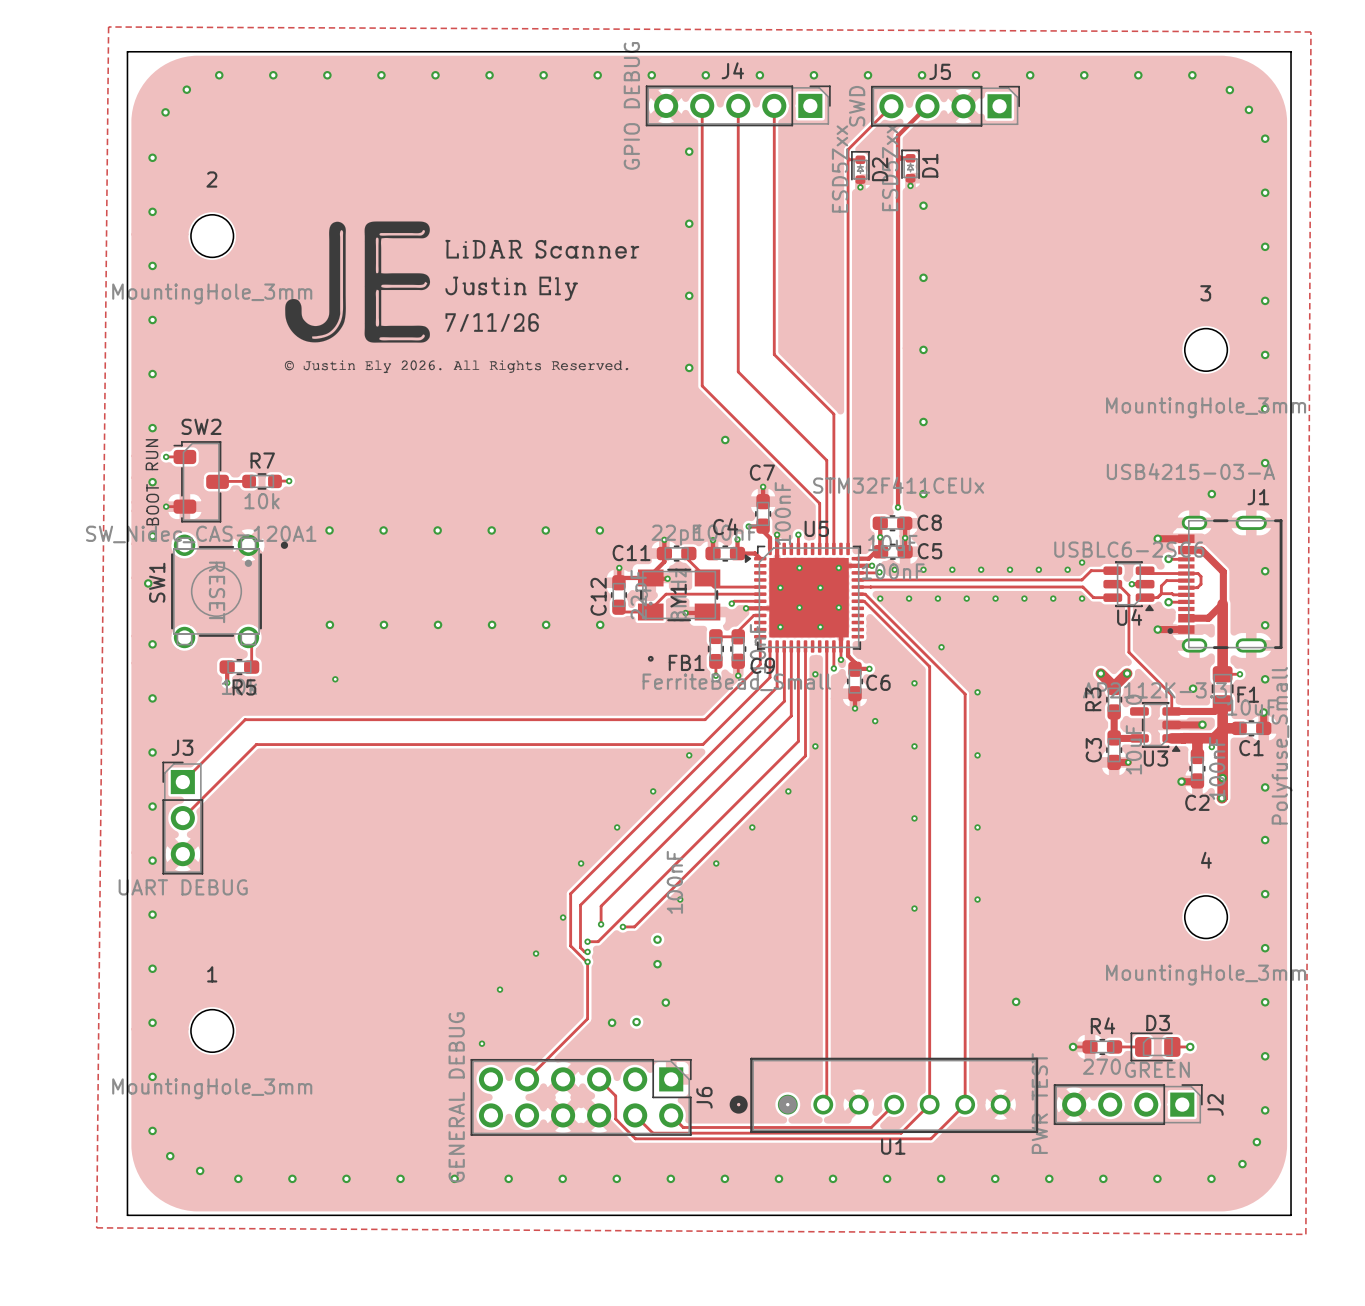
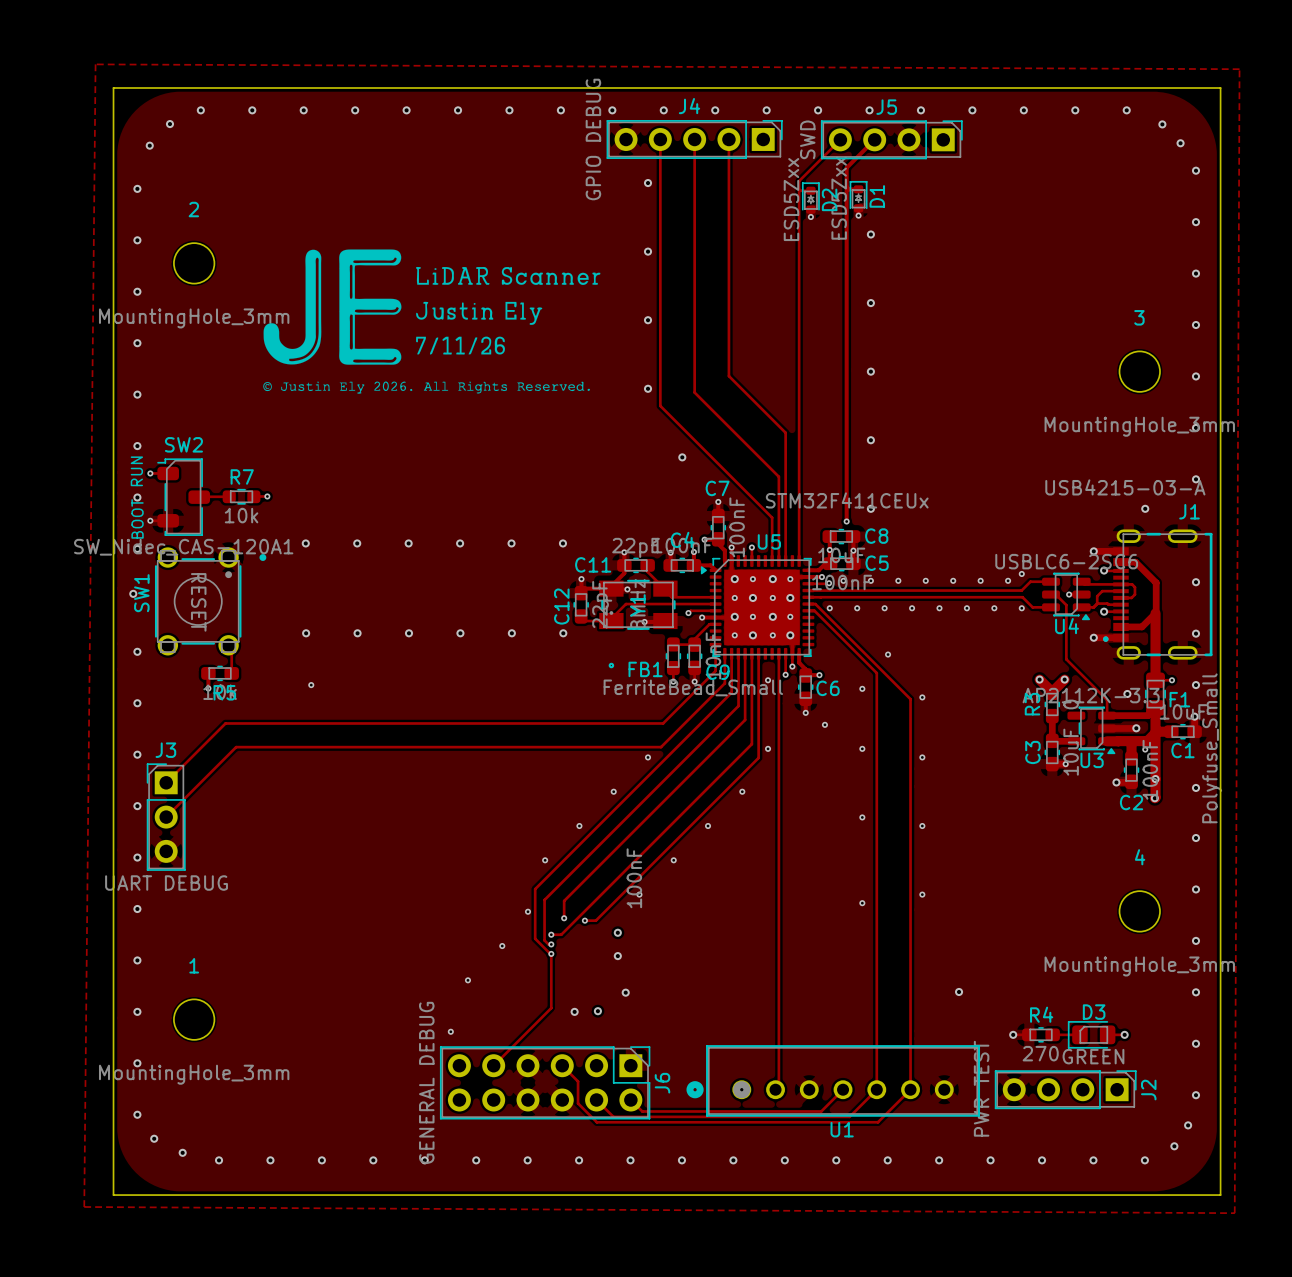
via: none -> (734, 579)
via: none -> (772, 579)
via: none -> (752, 597)
via: none -> (790, 597)
via: none -> (734, 616)
via: none -> (772, 616)
via: none -> (752, 635)
via: none -> (790, 635)

